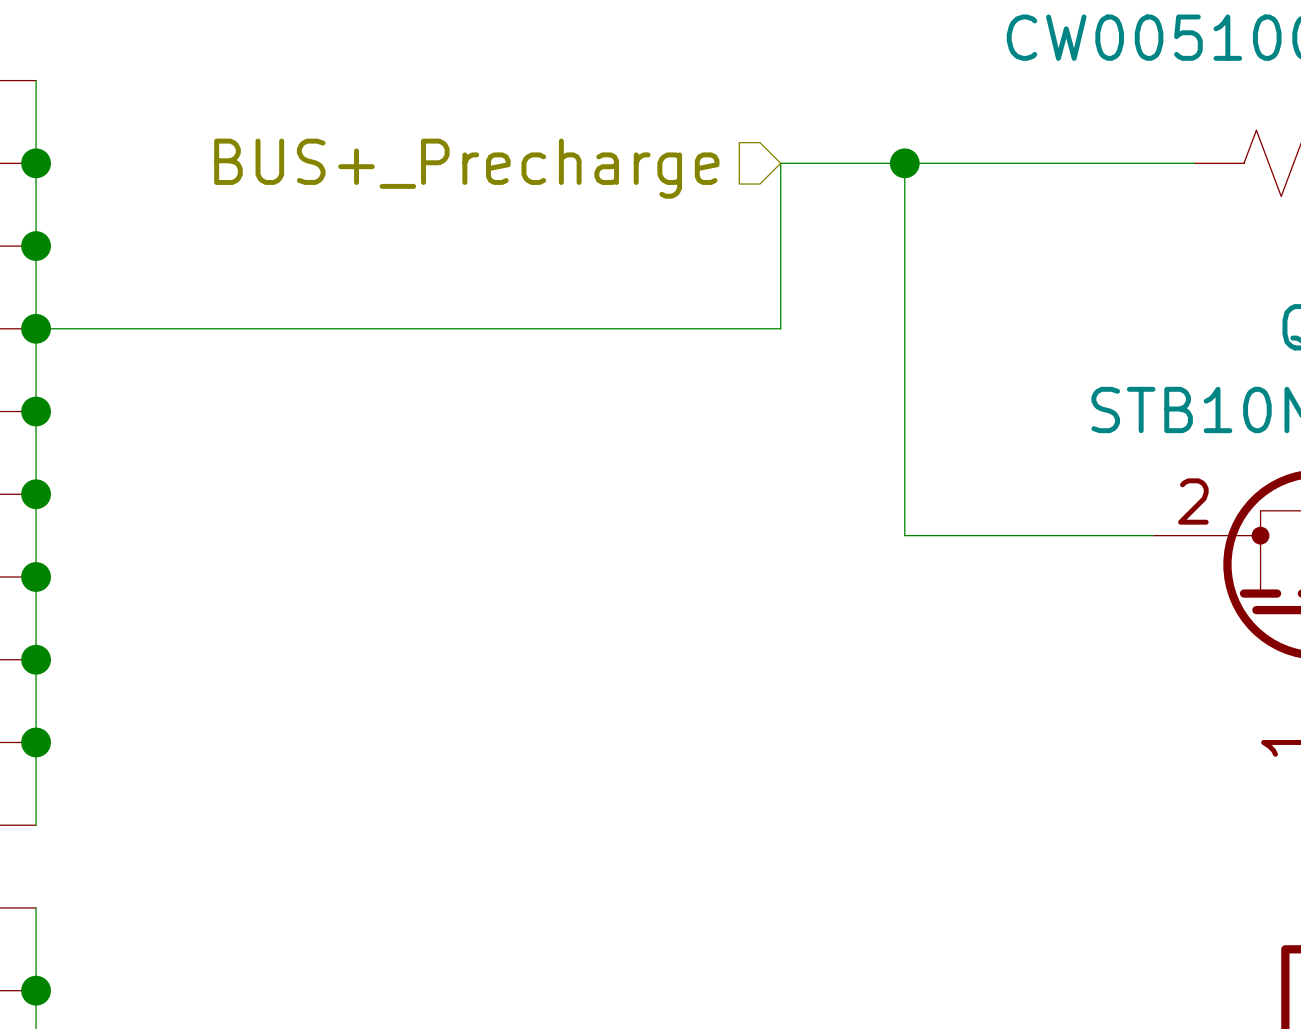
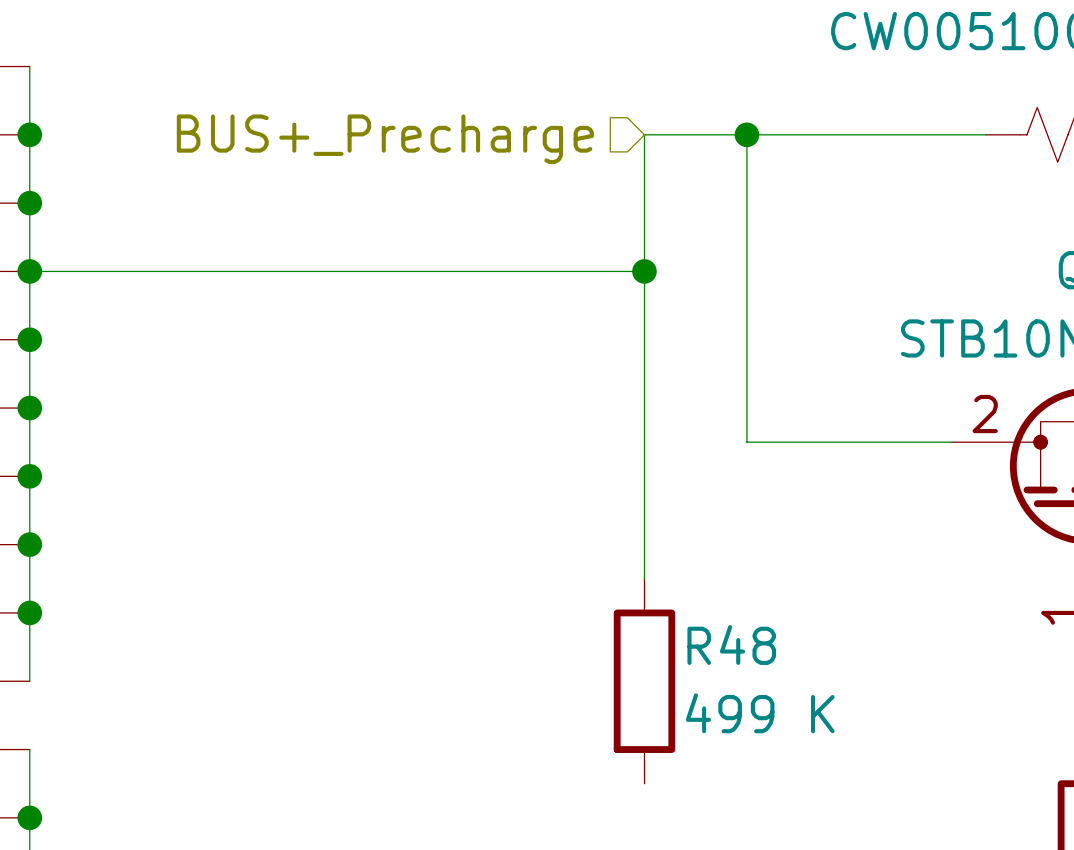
wire: none -> (644, 271) (644, 578)
junction: none -> (644, 271)
R48: none -> 499 K (644, 681)

